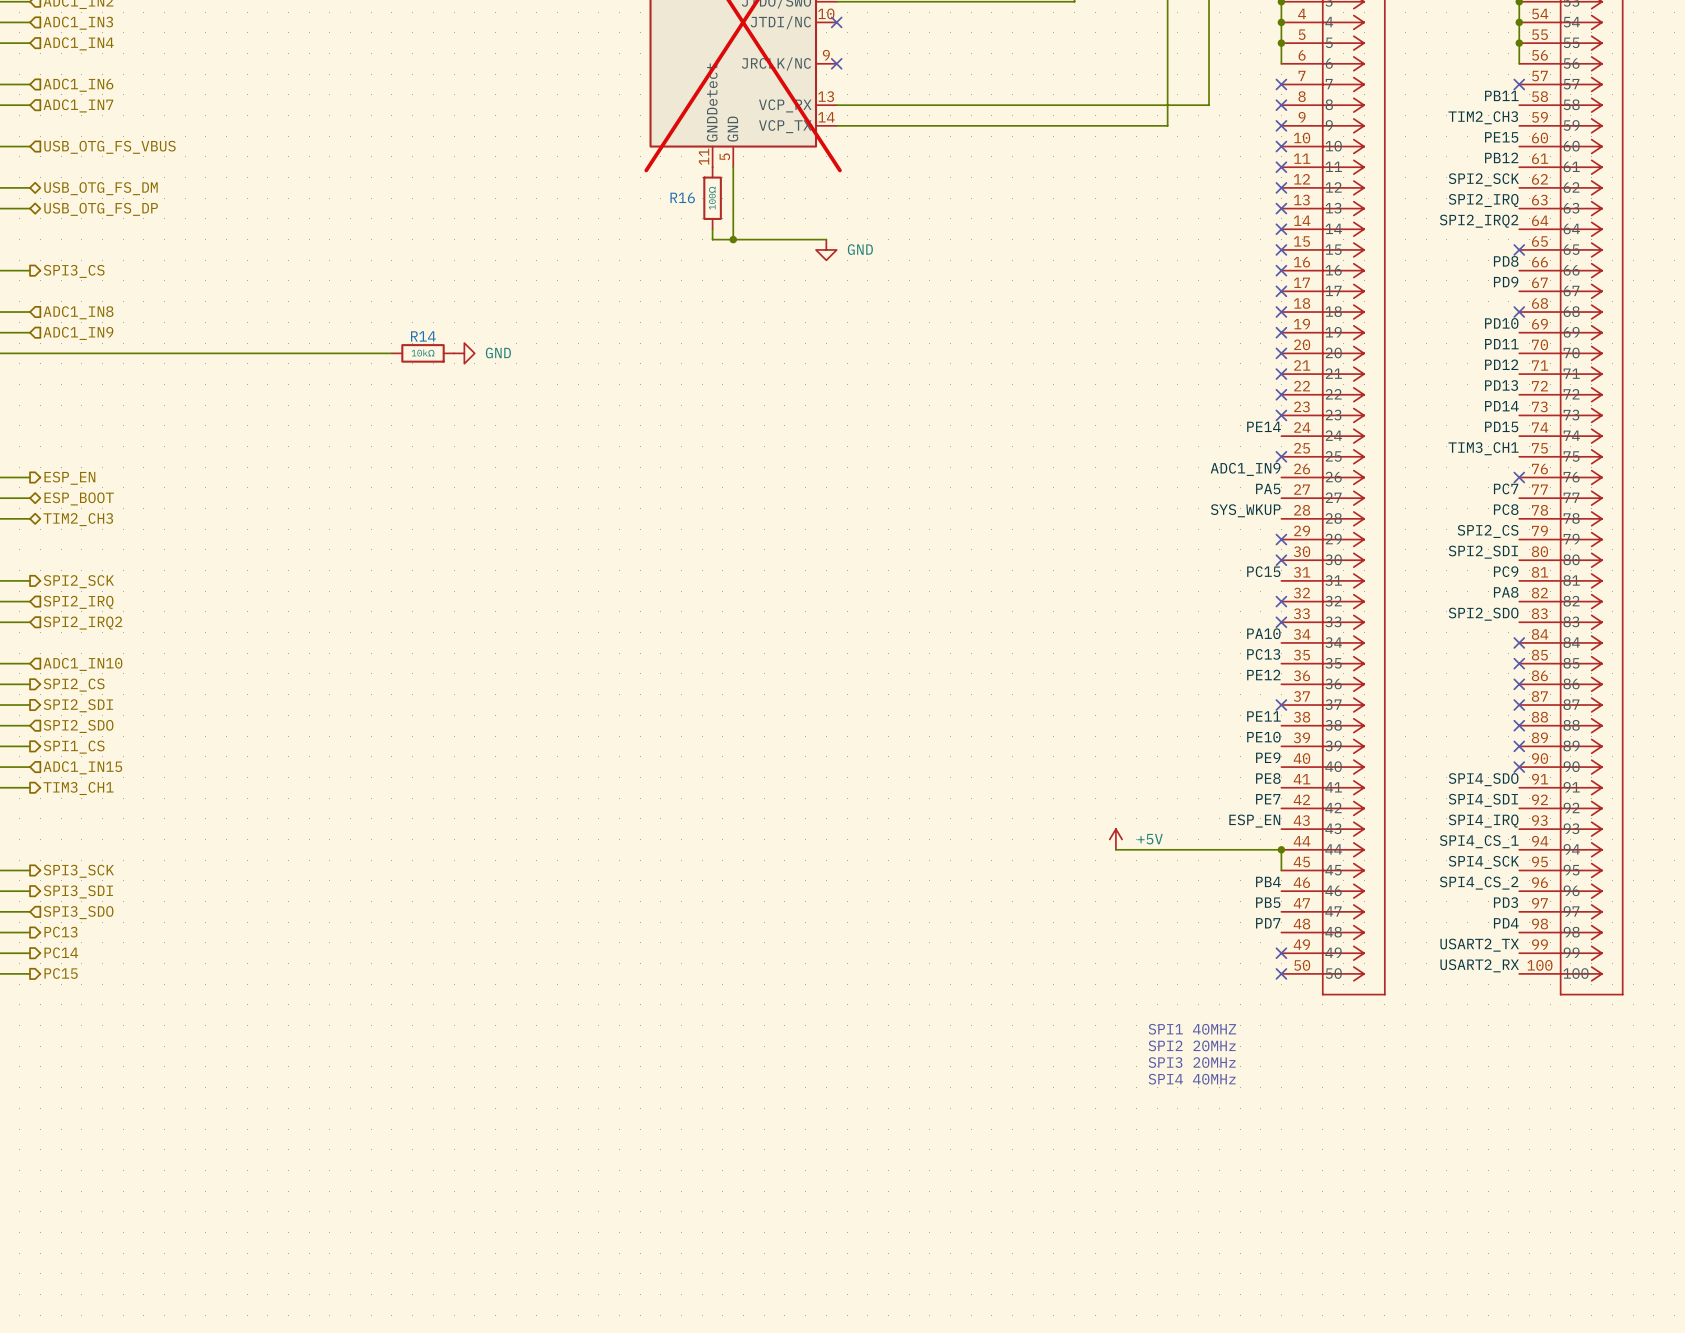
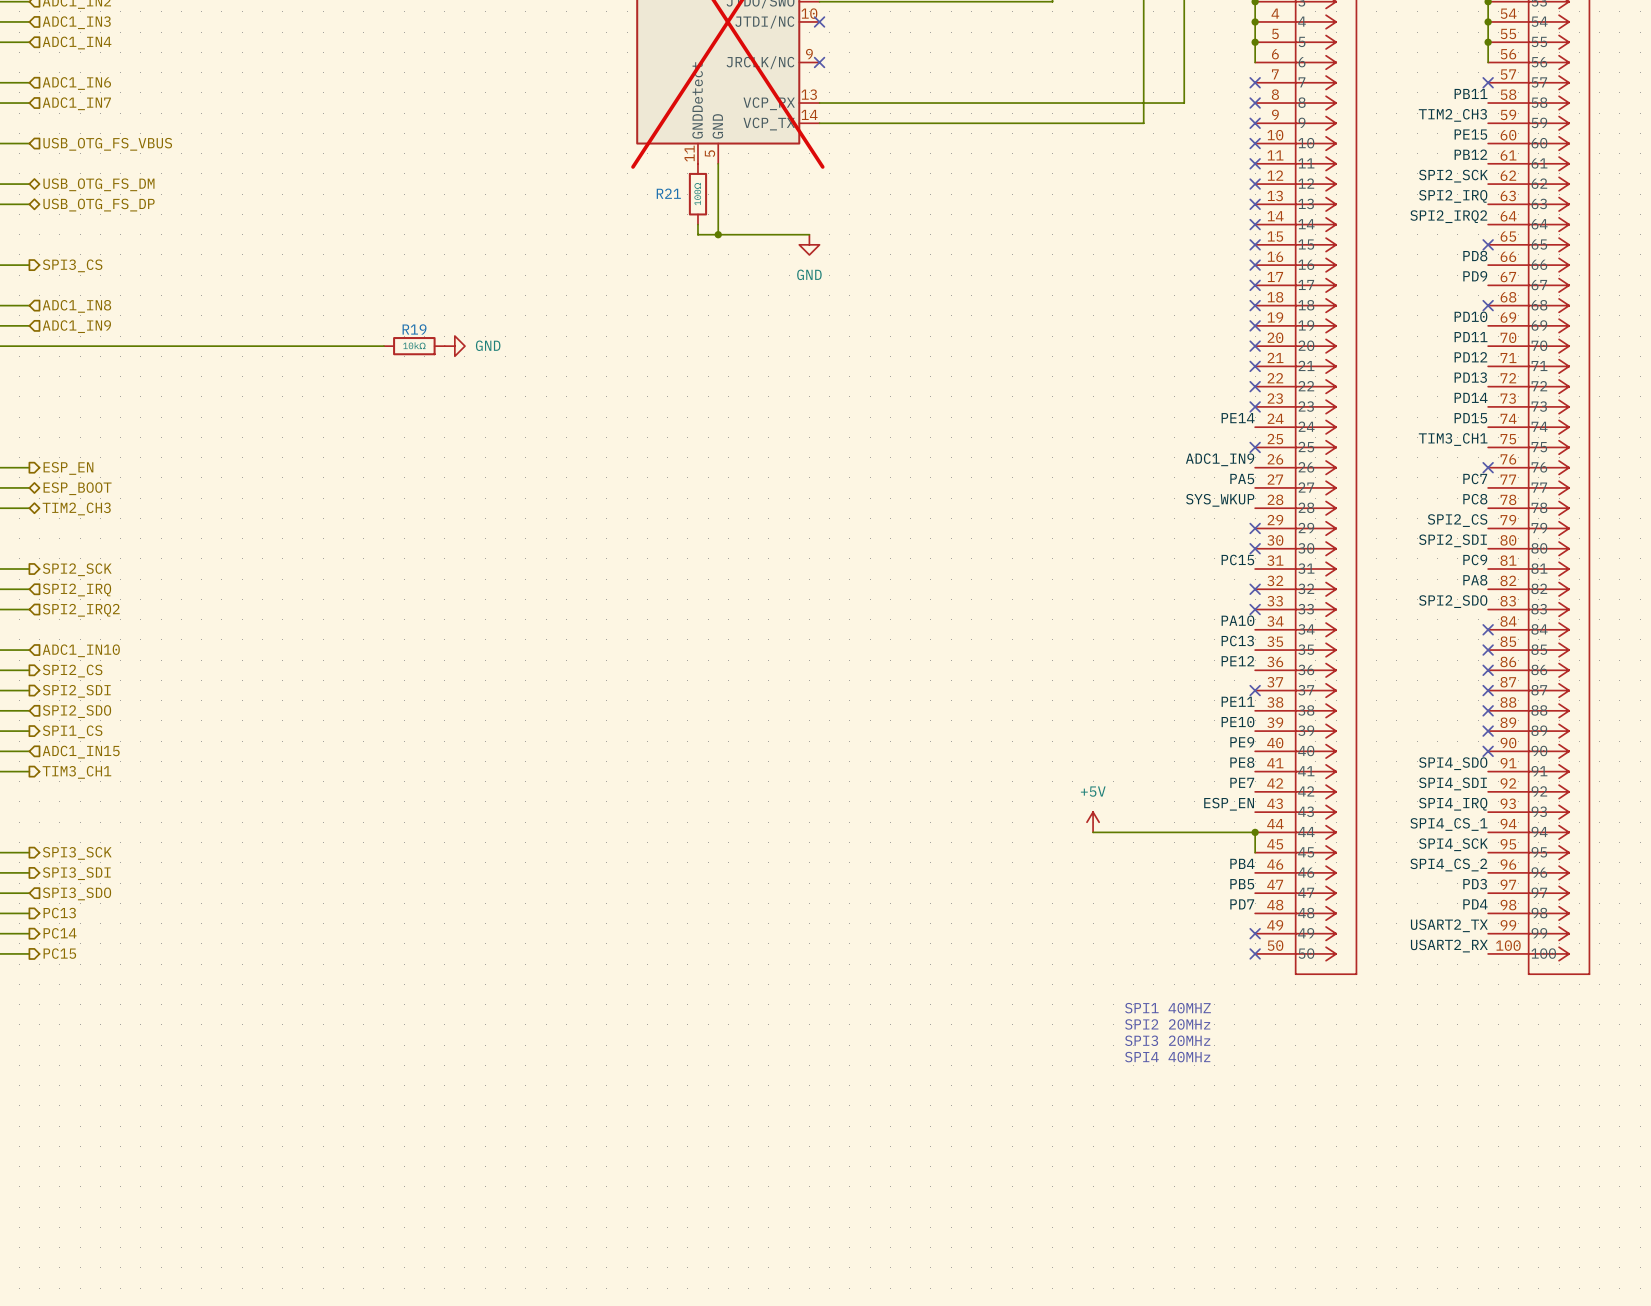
R16 name: R16 (682, 197) -> R21 (668, 193)
power symbol text position: GND (860, 249) -> GND (809, 274)
R14 name: R14 (423, 336) -> R19 (414, 329)
power symbol text position: +5V (1150, 839) -> +5V (1093, 791)

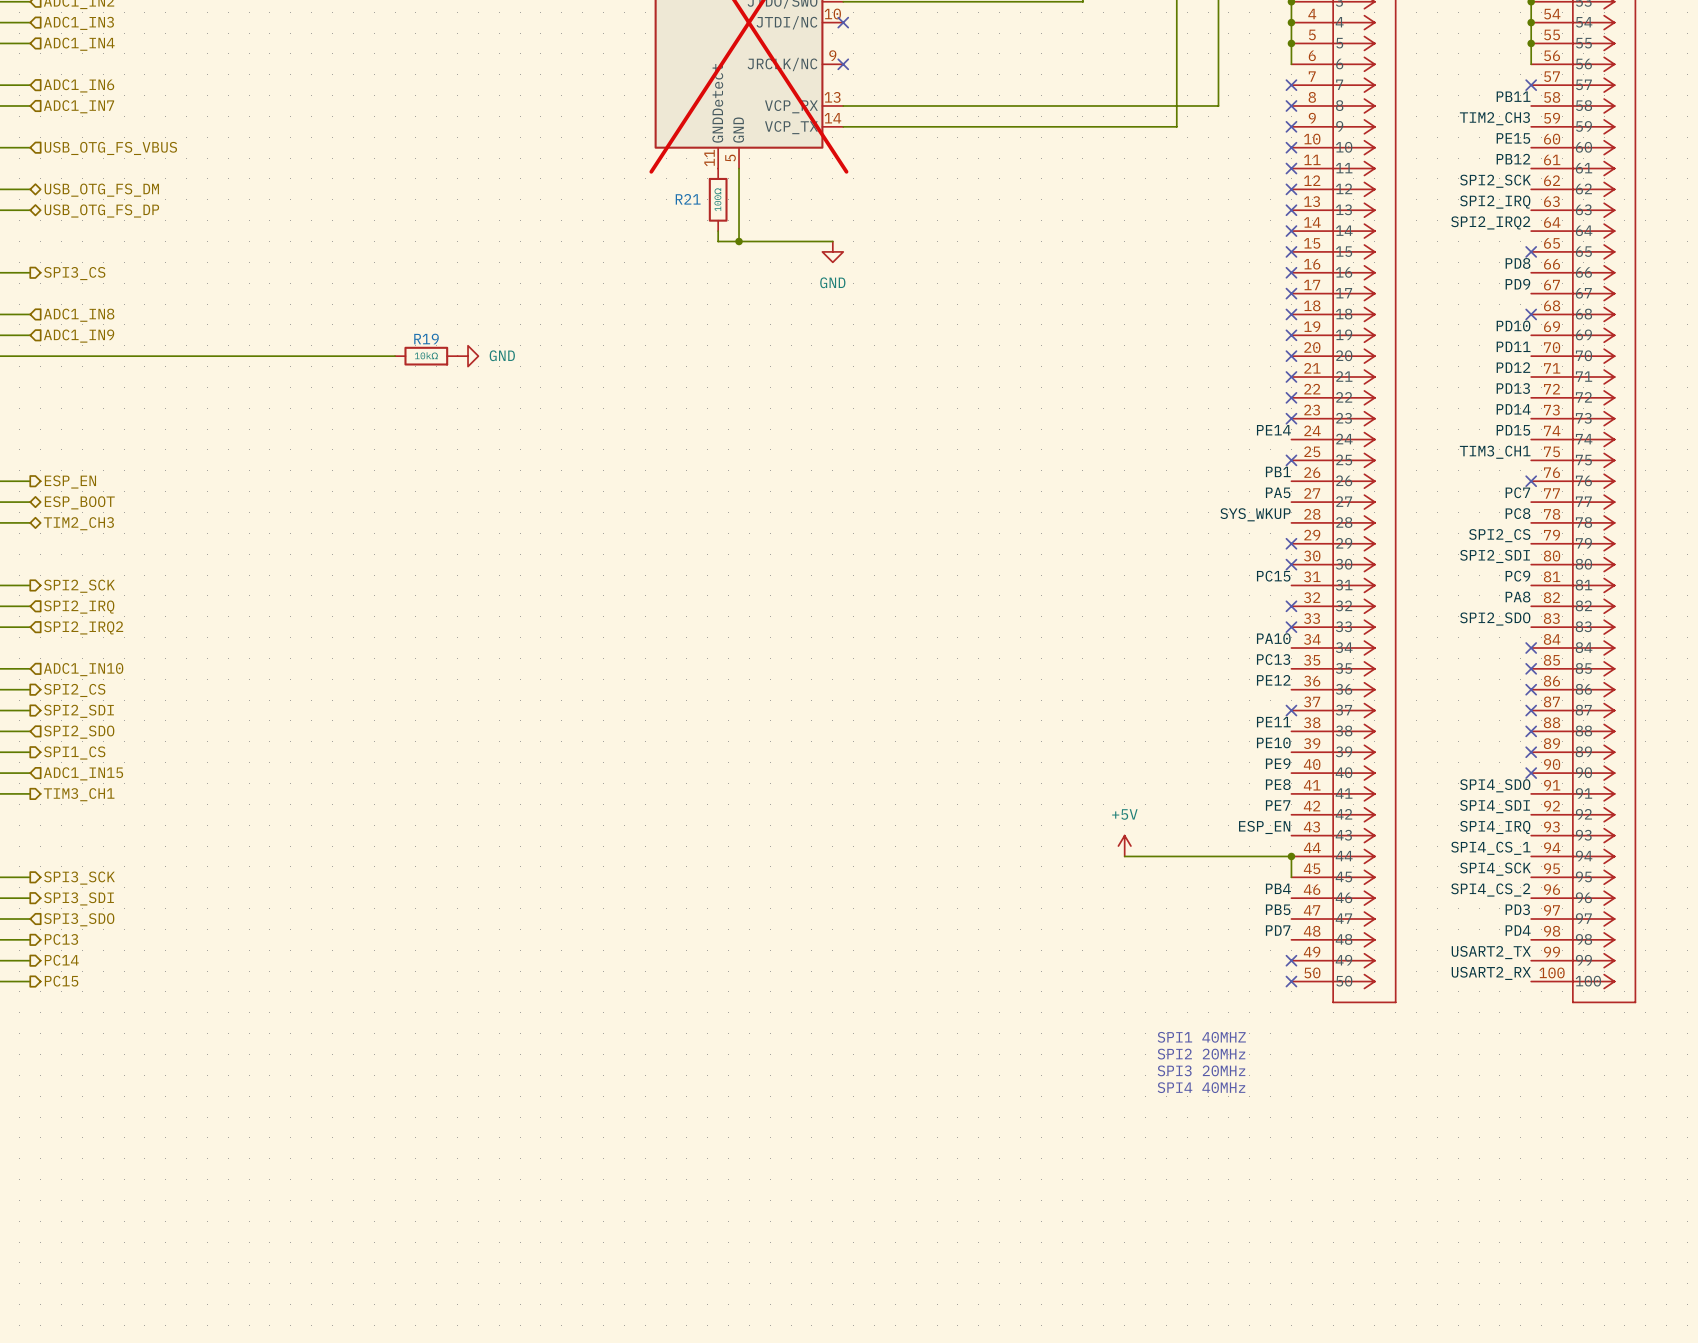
label: ADC1_IN9 (1220, 459) -> PB1 (1278, 471)

